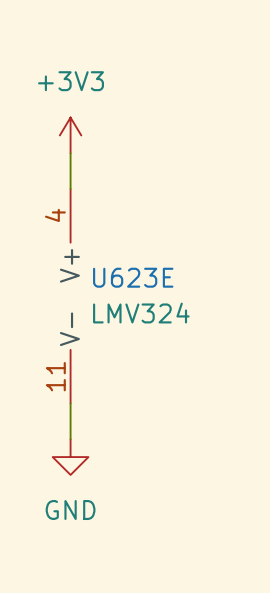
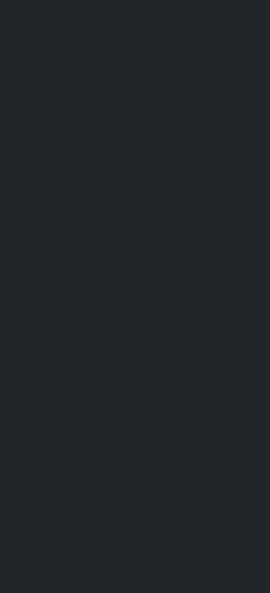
power symbol: +3V3 (70, 135) -> none
wire: (70, 153) (70, 189) -> none
U623E: LMV324 (70, 296) -> none
wire: (70, 403) (70, 439) -> none
power symbol: GND (70, 457) -> none

